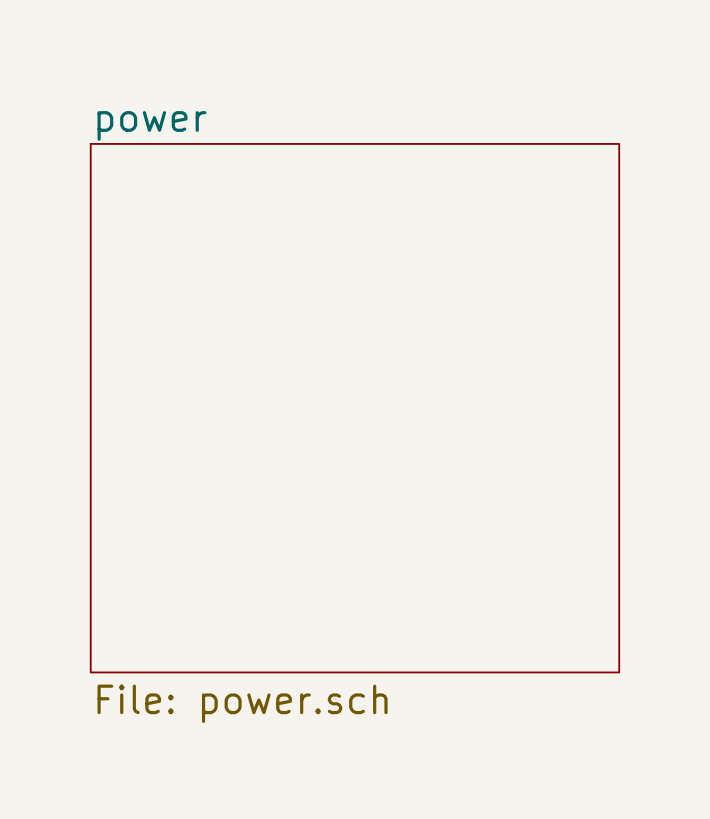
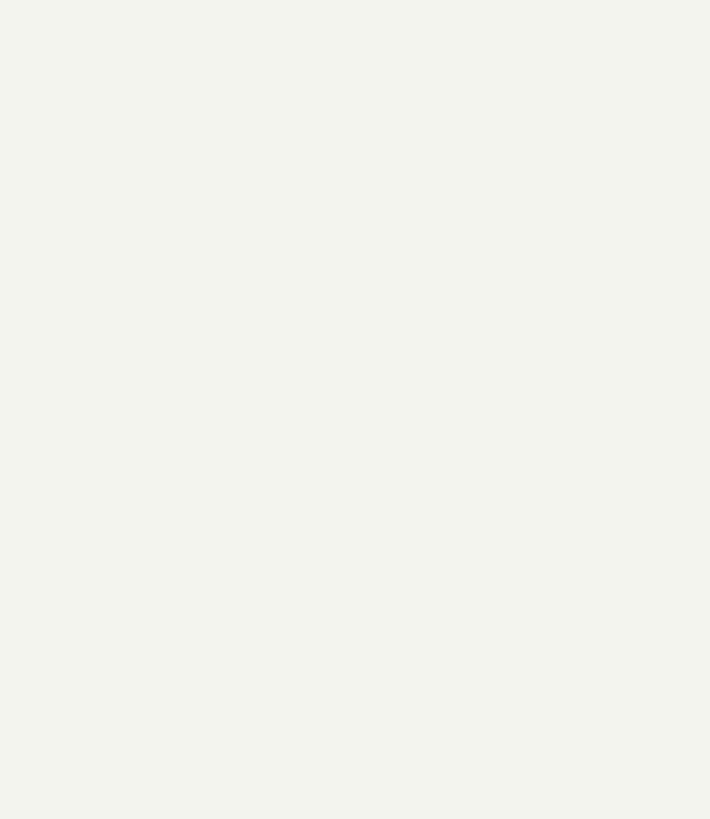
sheet power: File: power.sch (354, 408) -> none

